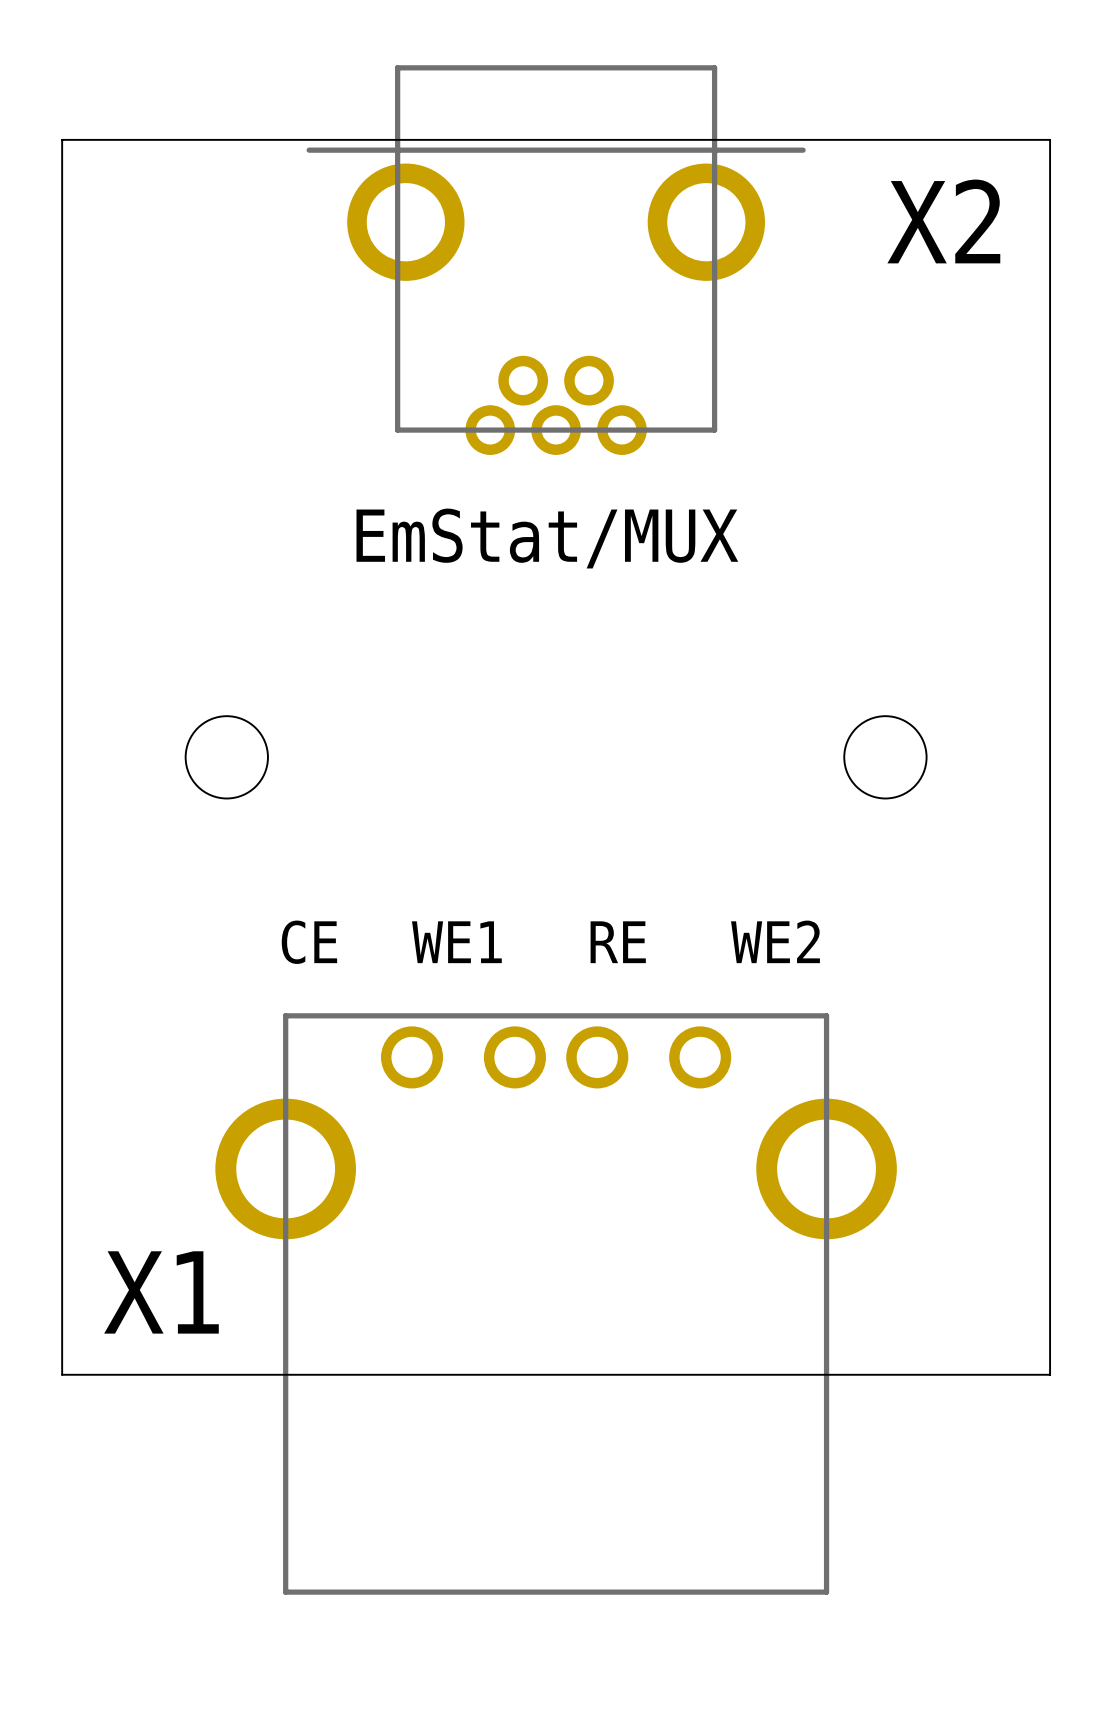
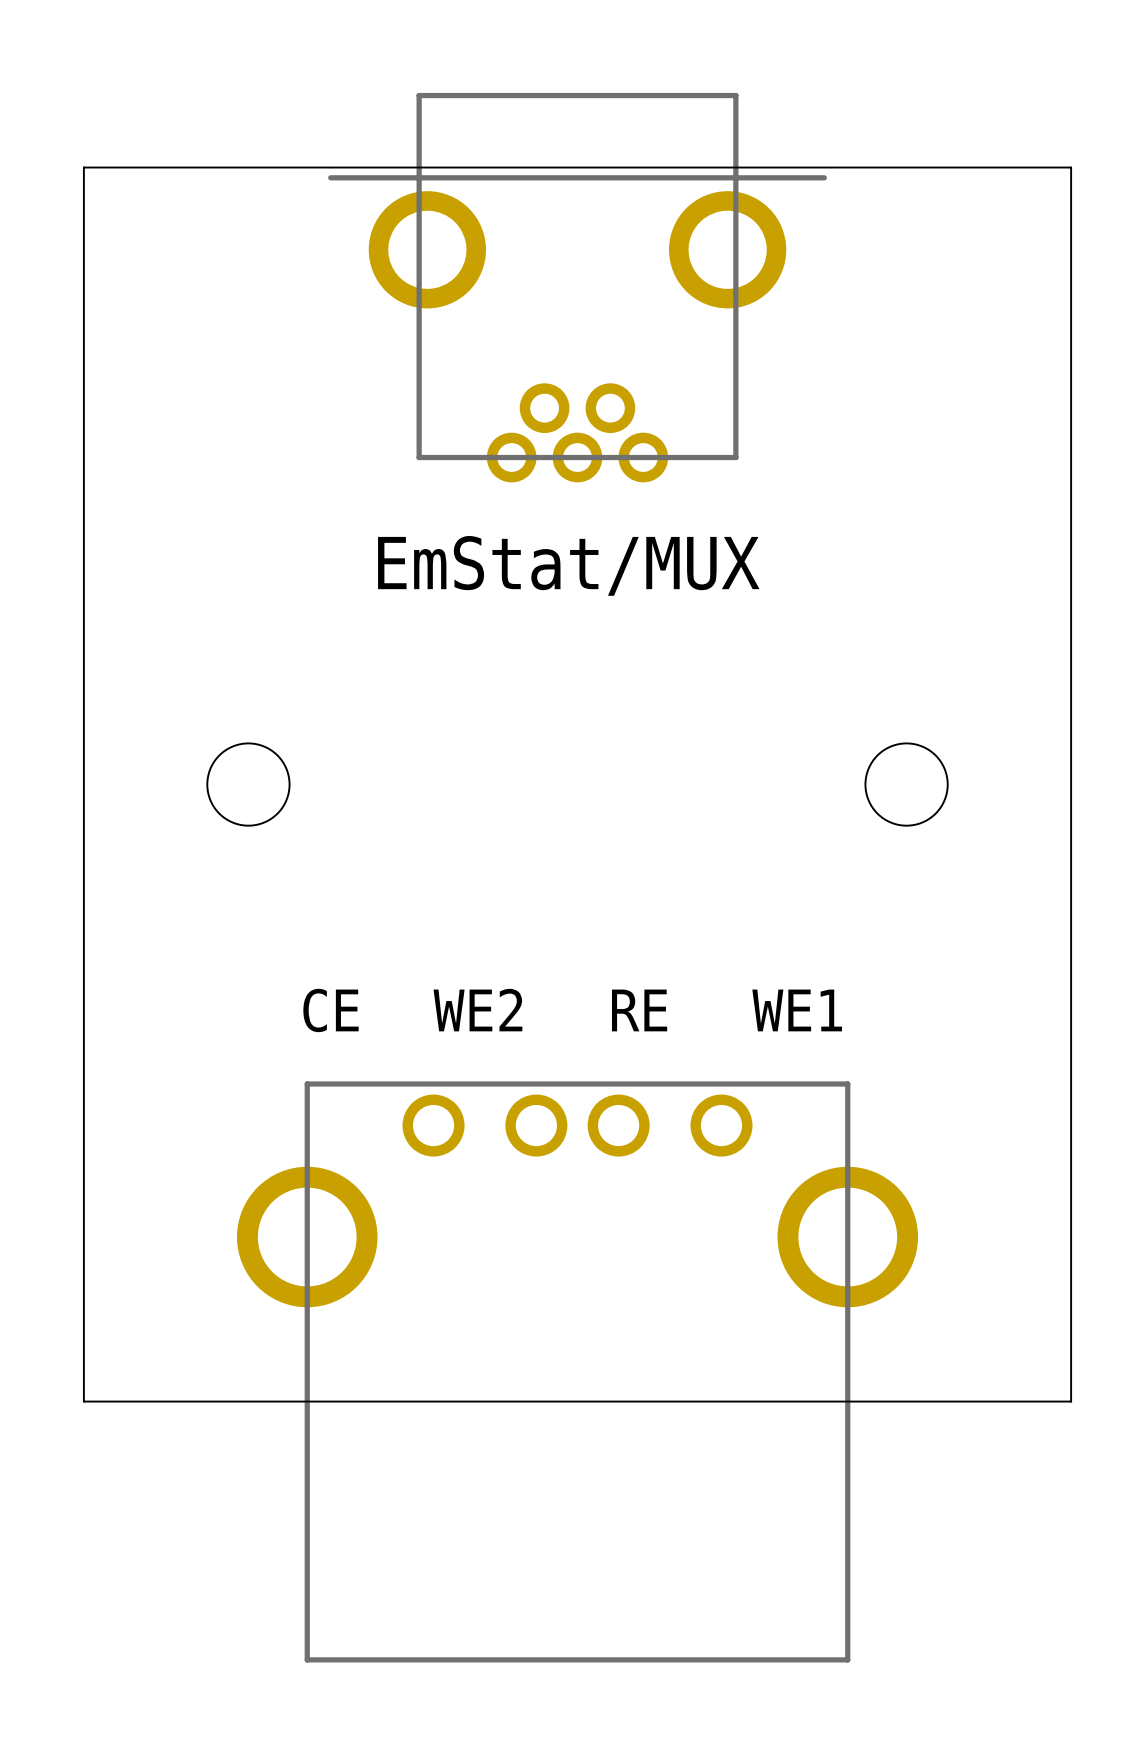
X2 name: X2 (943, 221) -> none
text position: WE2 (775, 941) -> WE2 (477, 1010)
text position: CE (309, 942) -> CE (331, 1010)
text position: WE1 (456, 942) -> WE1 (797, 1010)
text position: RE (618, 942) -> RE (639, 1010)
X1 name: X1 (161, 1292) -> none
X1 position: (556, 1303) -> (577, 1371)

